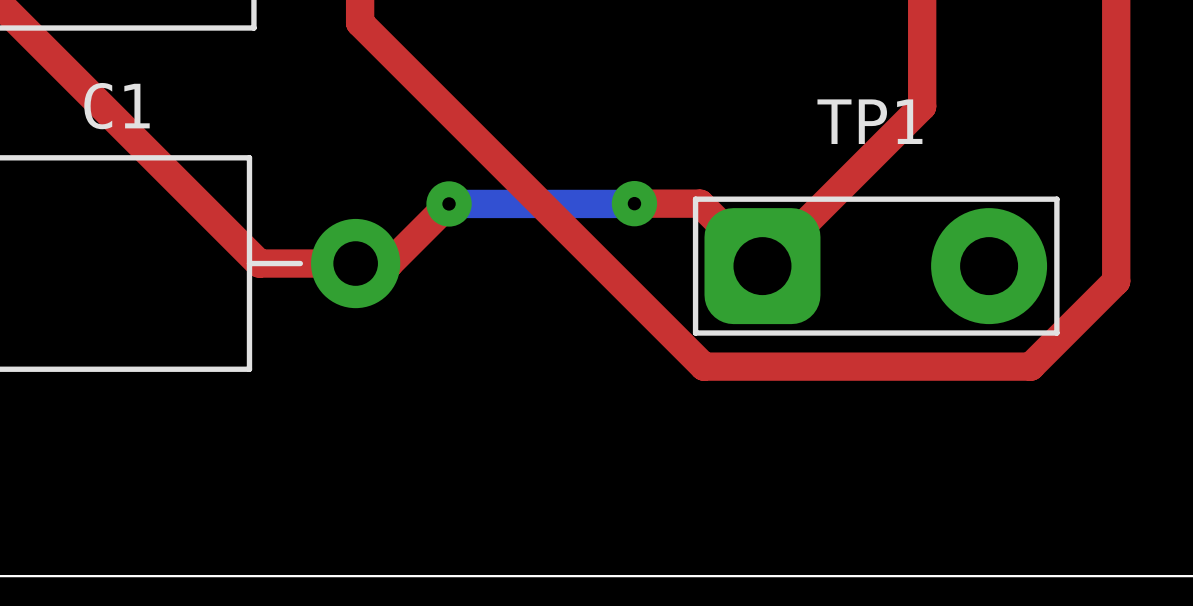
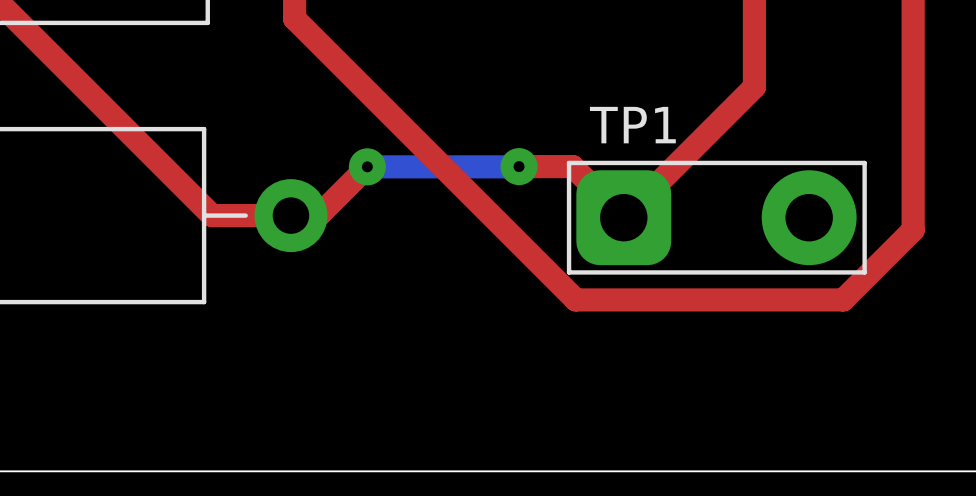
C1 name: C1 (117, 106) -> none
TP1 name position: TP1 (869, 121) -> TP1 (632, 125)

